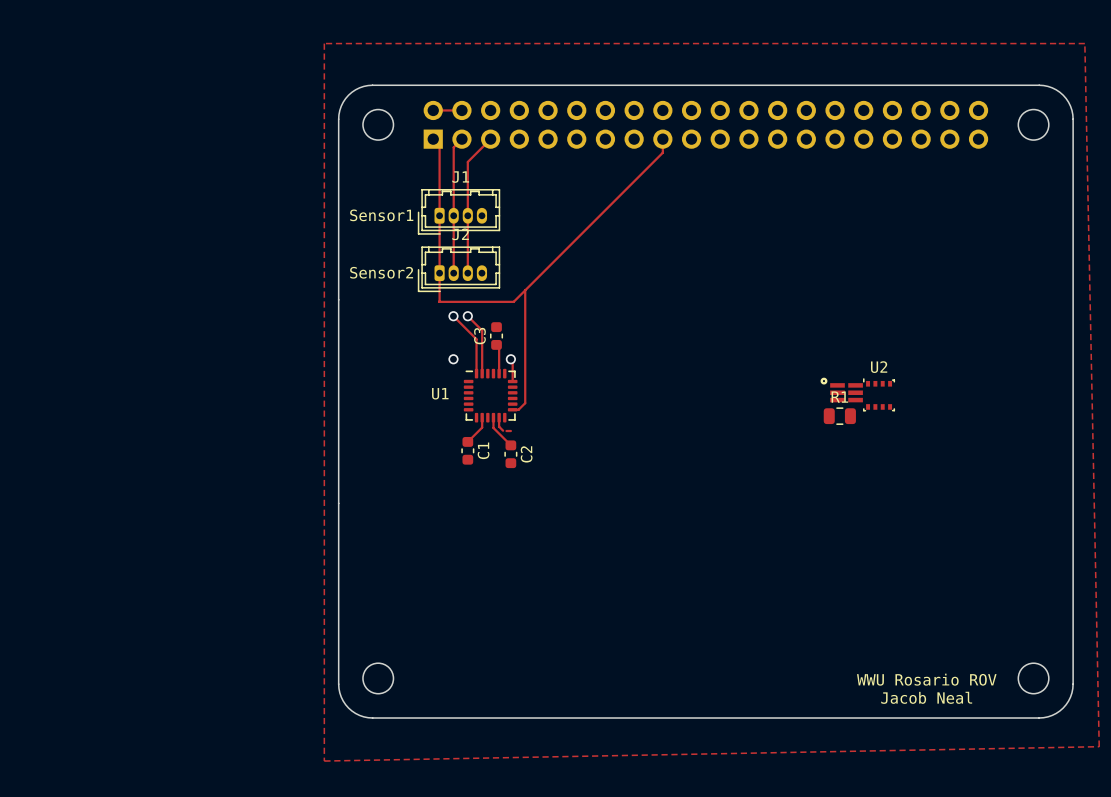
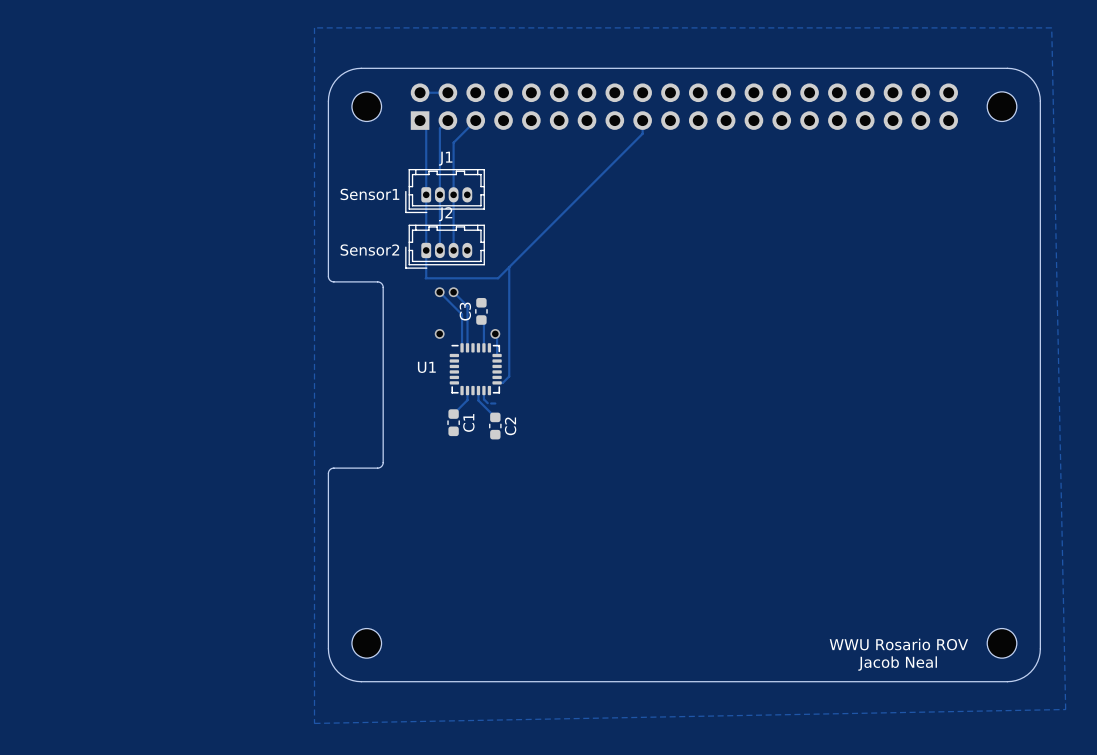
board edge: (338, 299) (338, 503) -> (328, 276) (332, 281) (378, 281) (383, 287) (382, 464) (378, 468) (333, 468) (328, 473)
part: (841, 390) -> none
U2: (879, 394) -> none
R1: (839, 416) -> none

